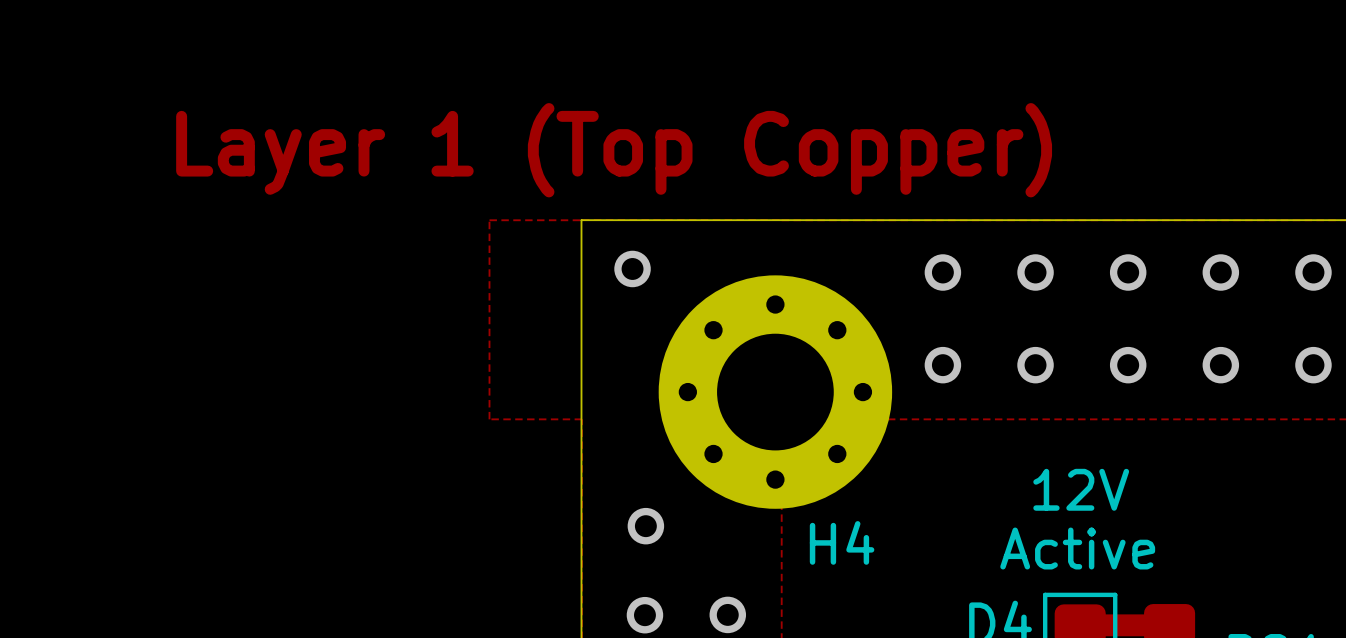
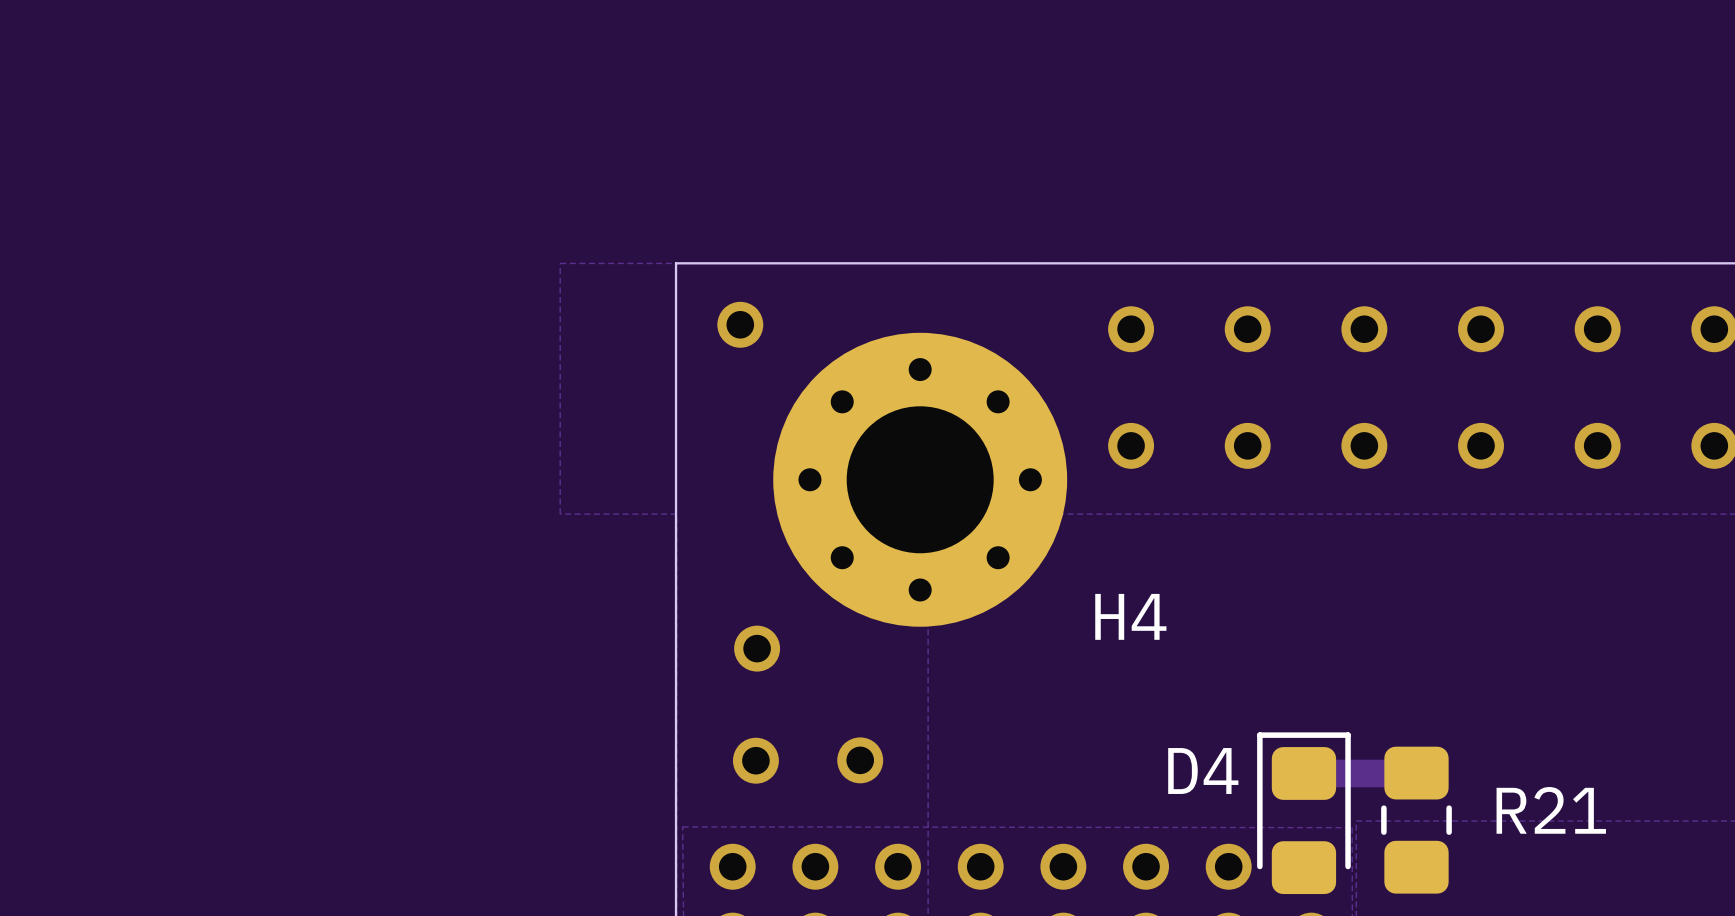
text: Layer 1 (Top Copper) (614, 150) -> none
text: 12V (1081, 489) -> none
H4 name position: H4 (842, 542) -> H4 (1130, 616)
text: Active (1077, 548) -> none

